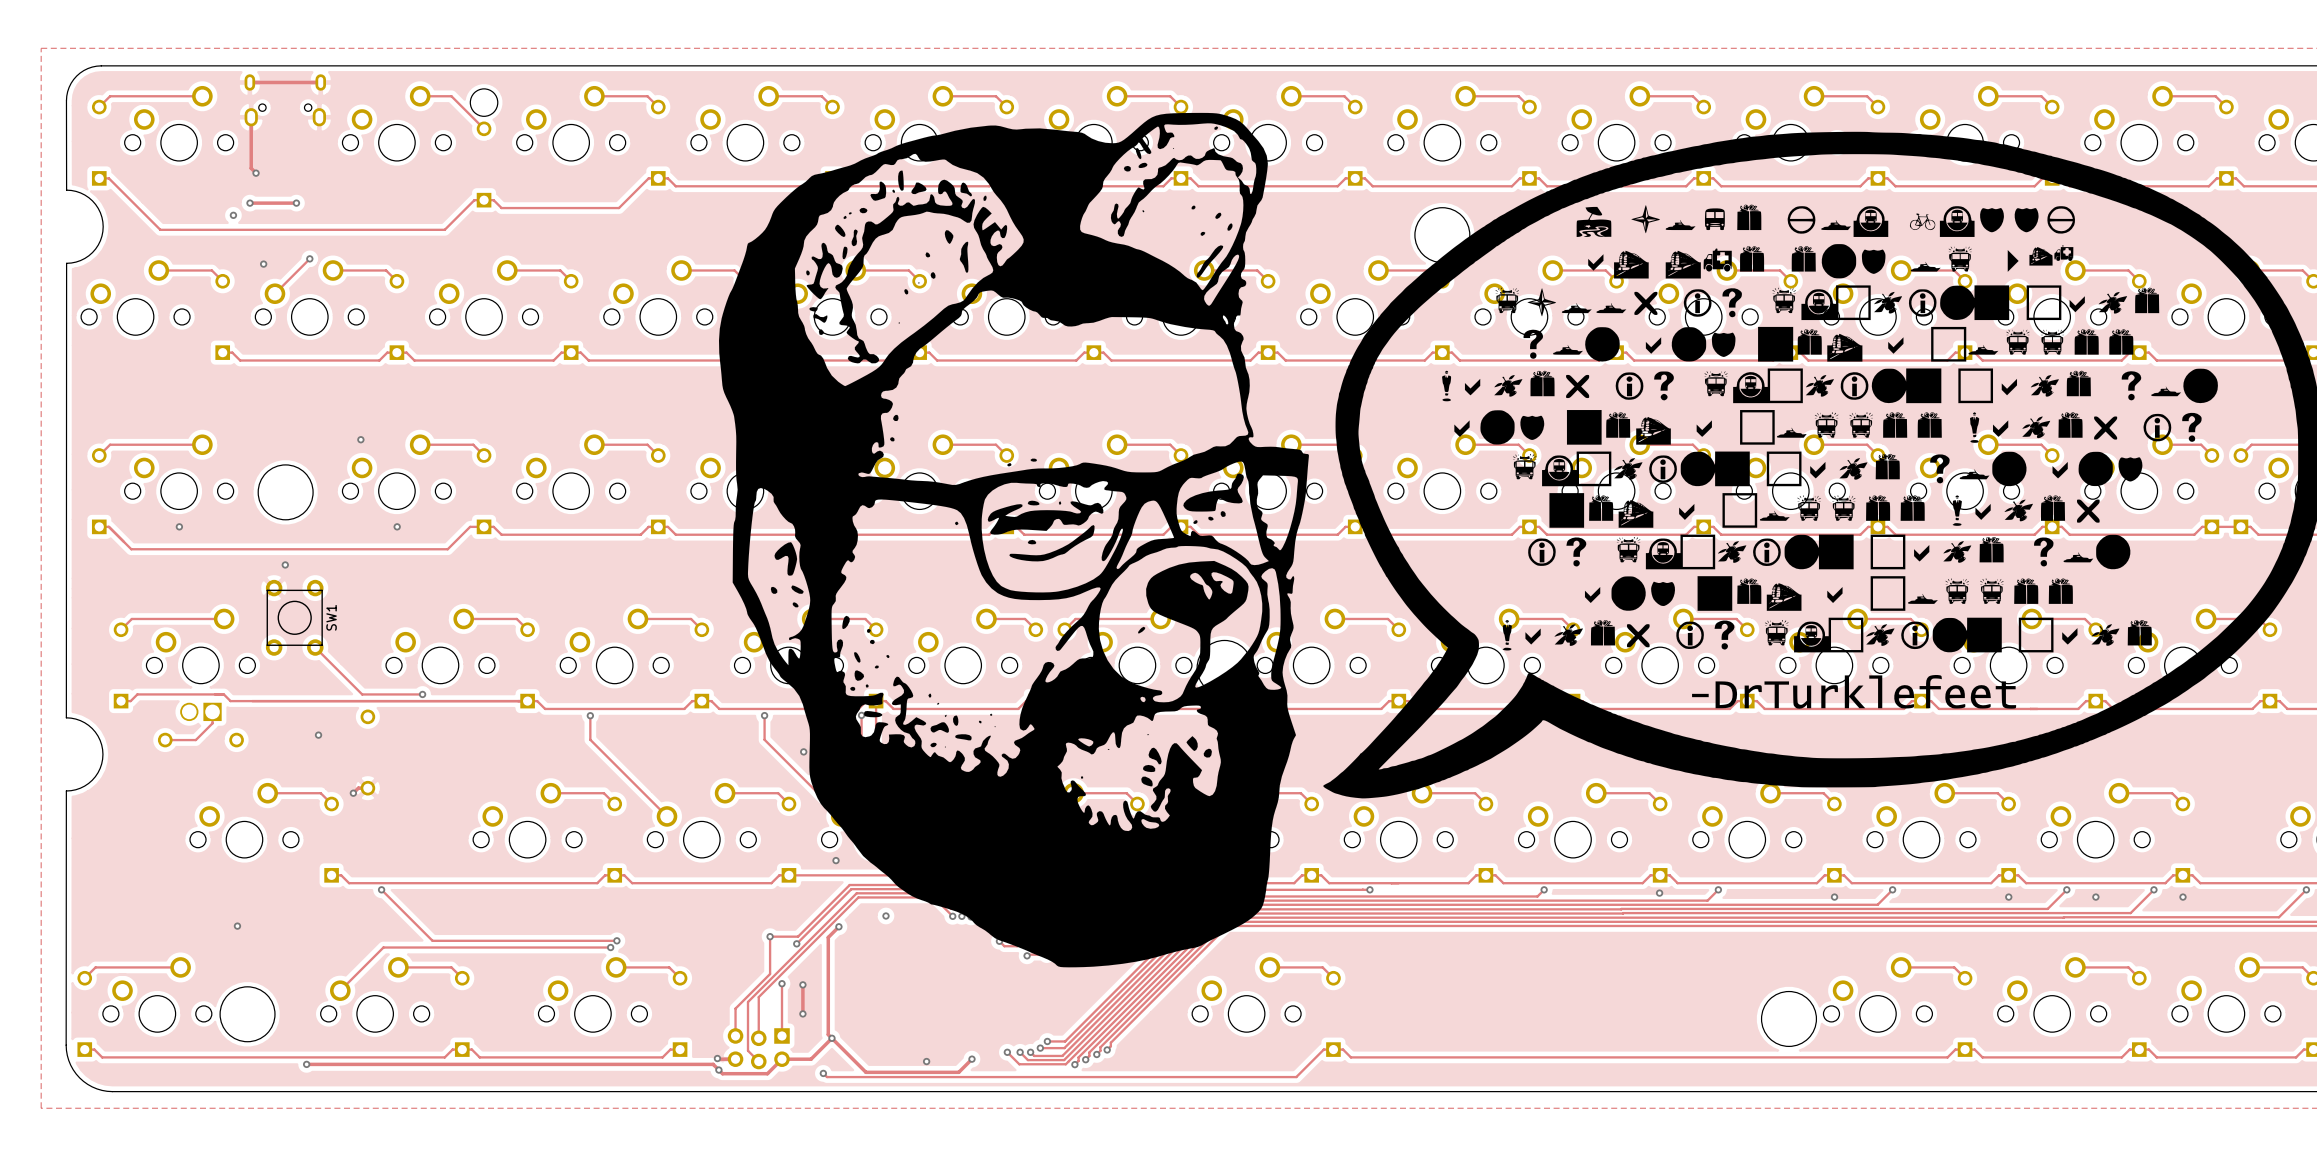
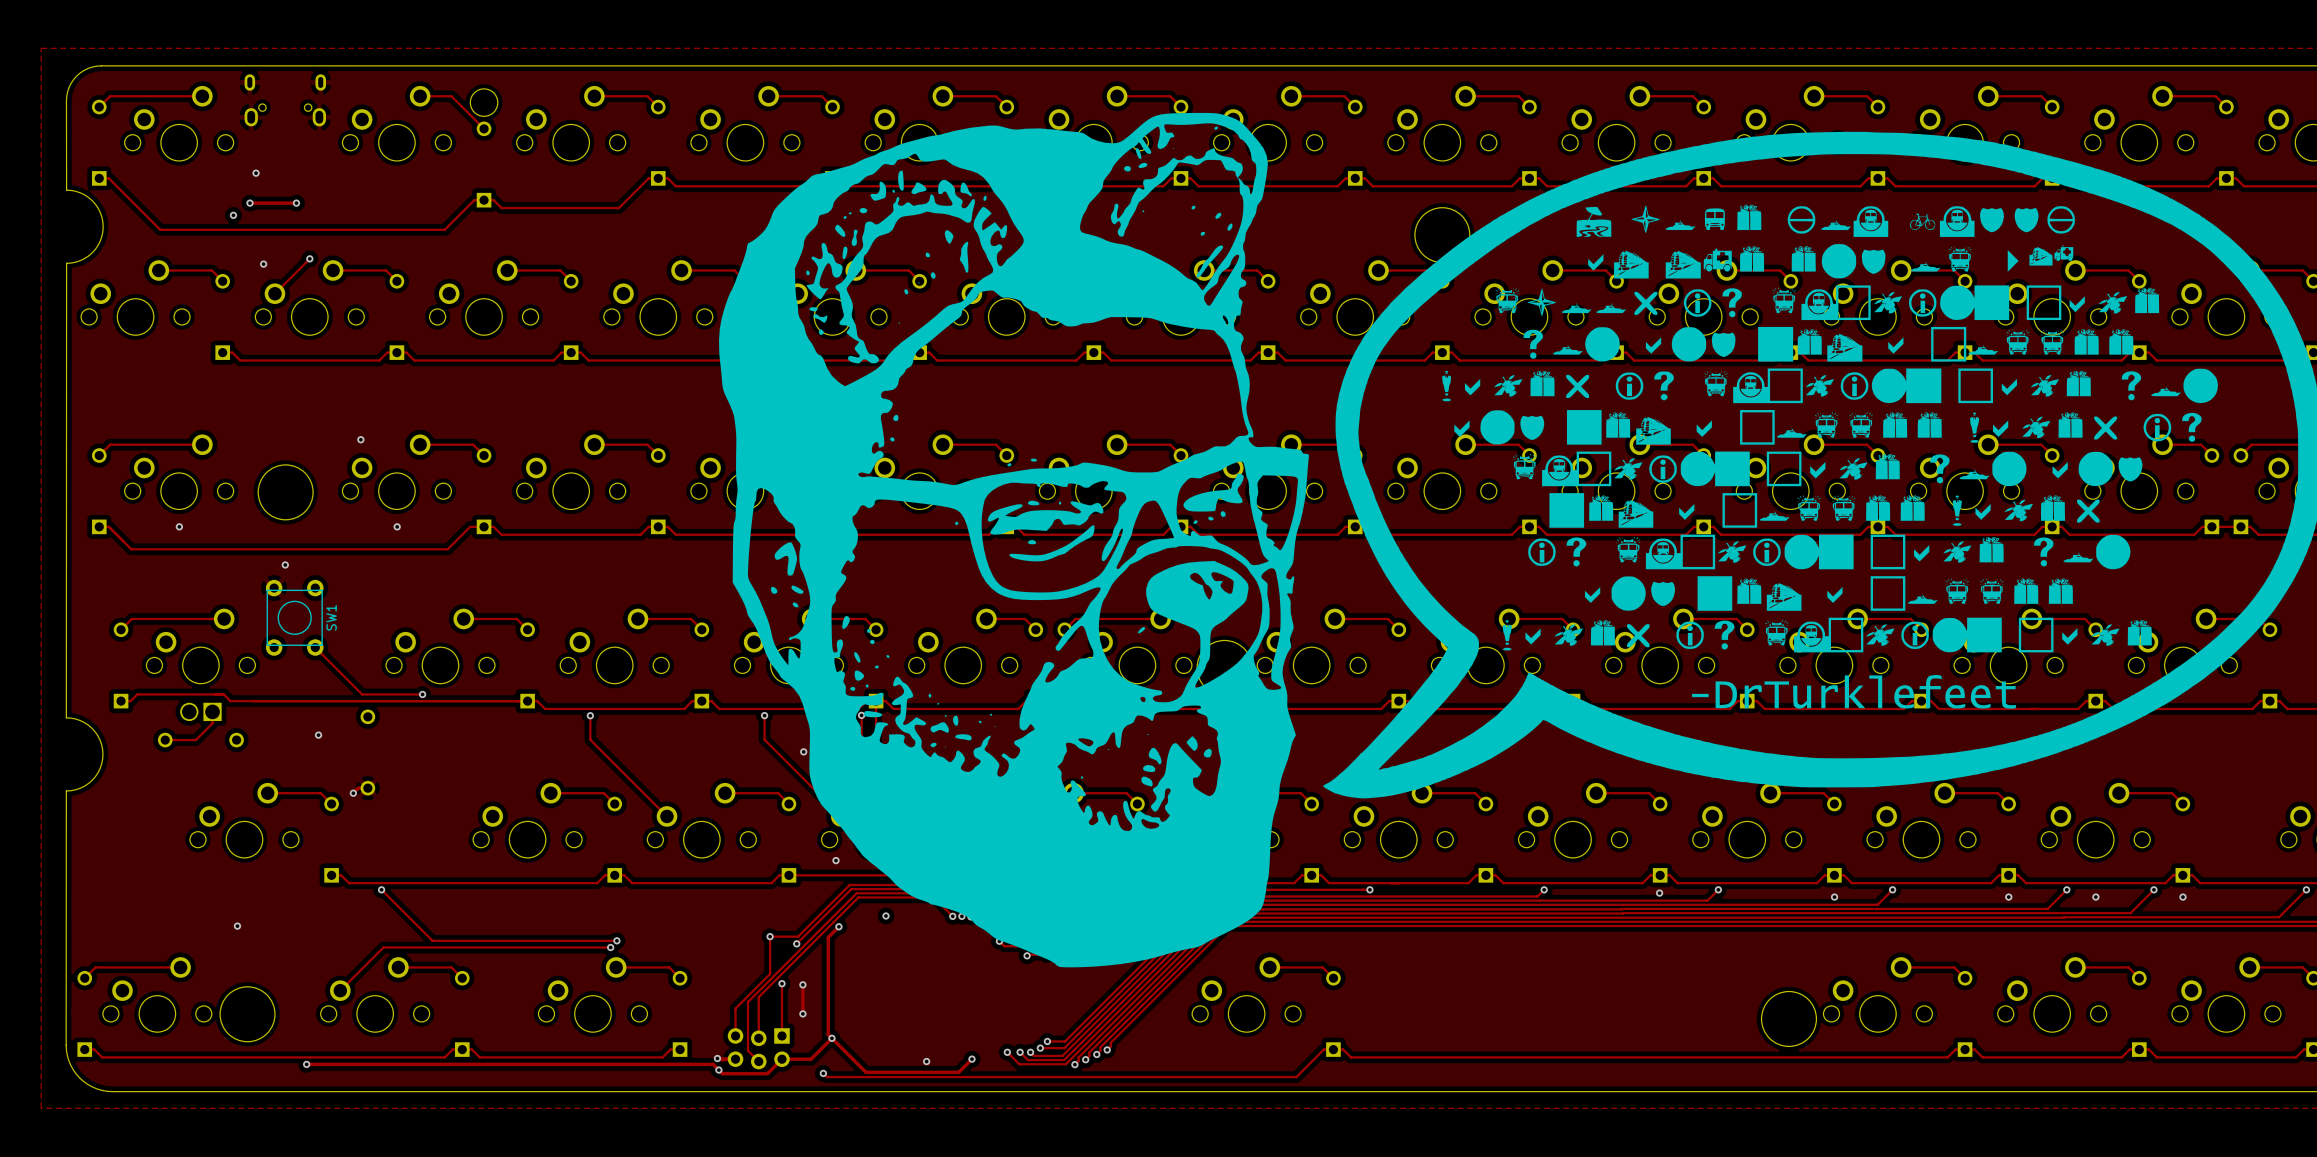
track: (249, 82) (320, 82) -> none
track: (251, 117) (251, 168) (256, 173) -> none

